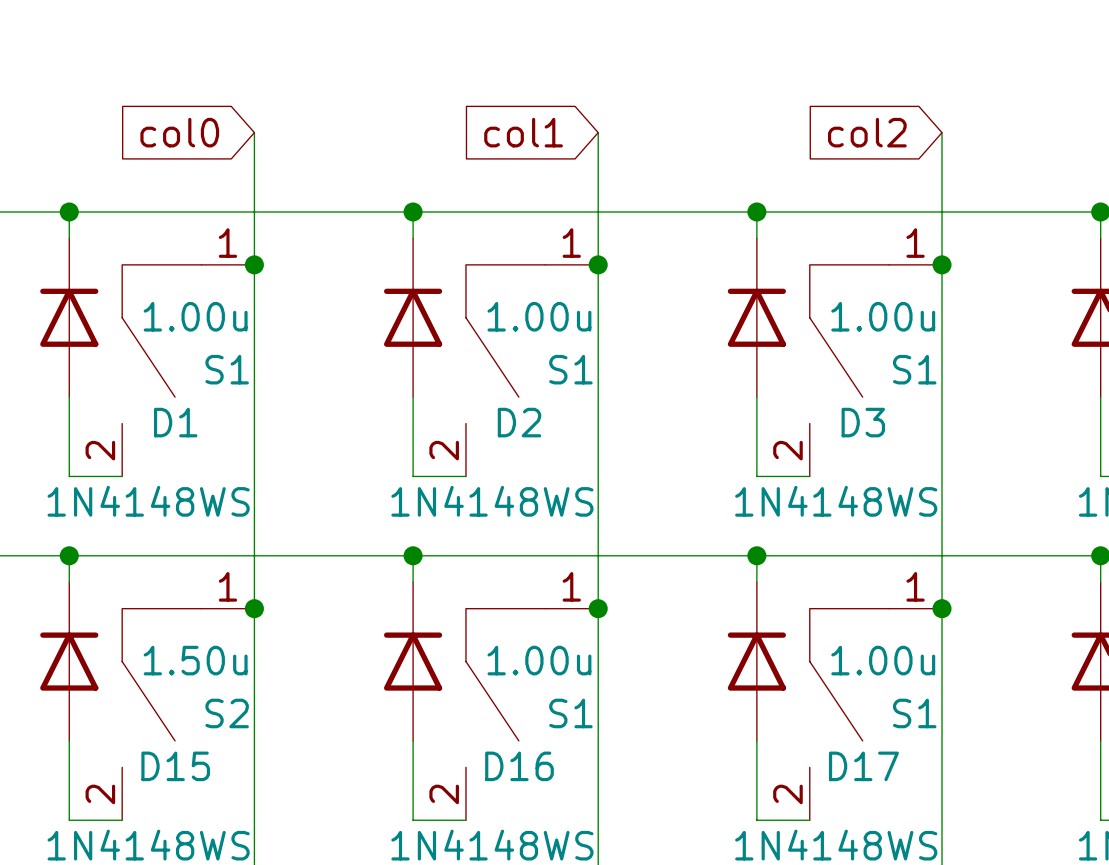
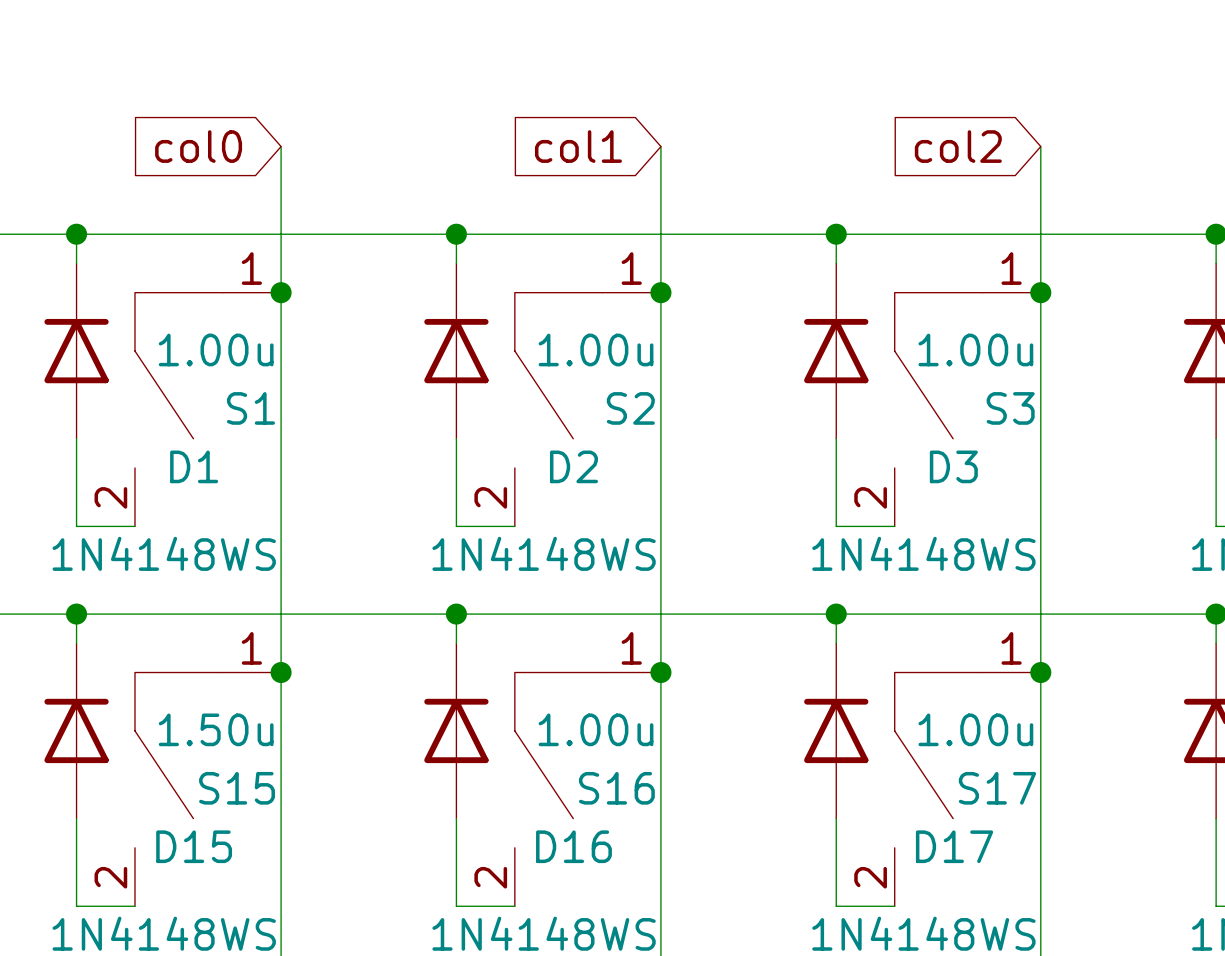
S1 name: S1 (570, 369) -> S2 (630, 408)
S1 name: S1 (914, 369) -> S3 (1010, 408)
S2 name: S2 (227, 713) -> S15 (237, 788)
S1 name: S1 (570, 713) -> S16 (616, 788)
S1 name: S1 (914, 713) -> S17 (997, 788)

